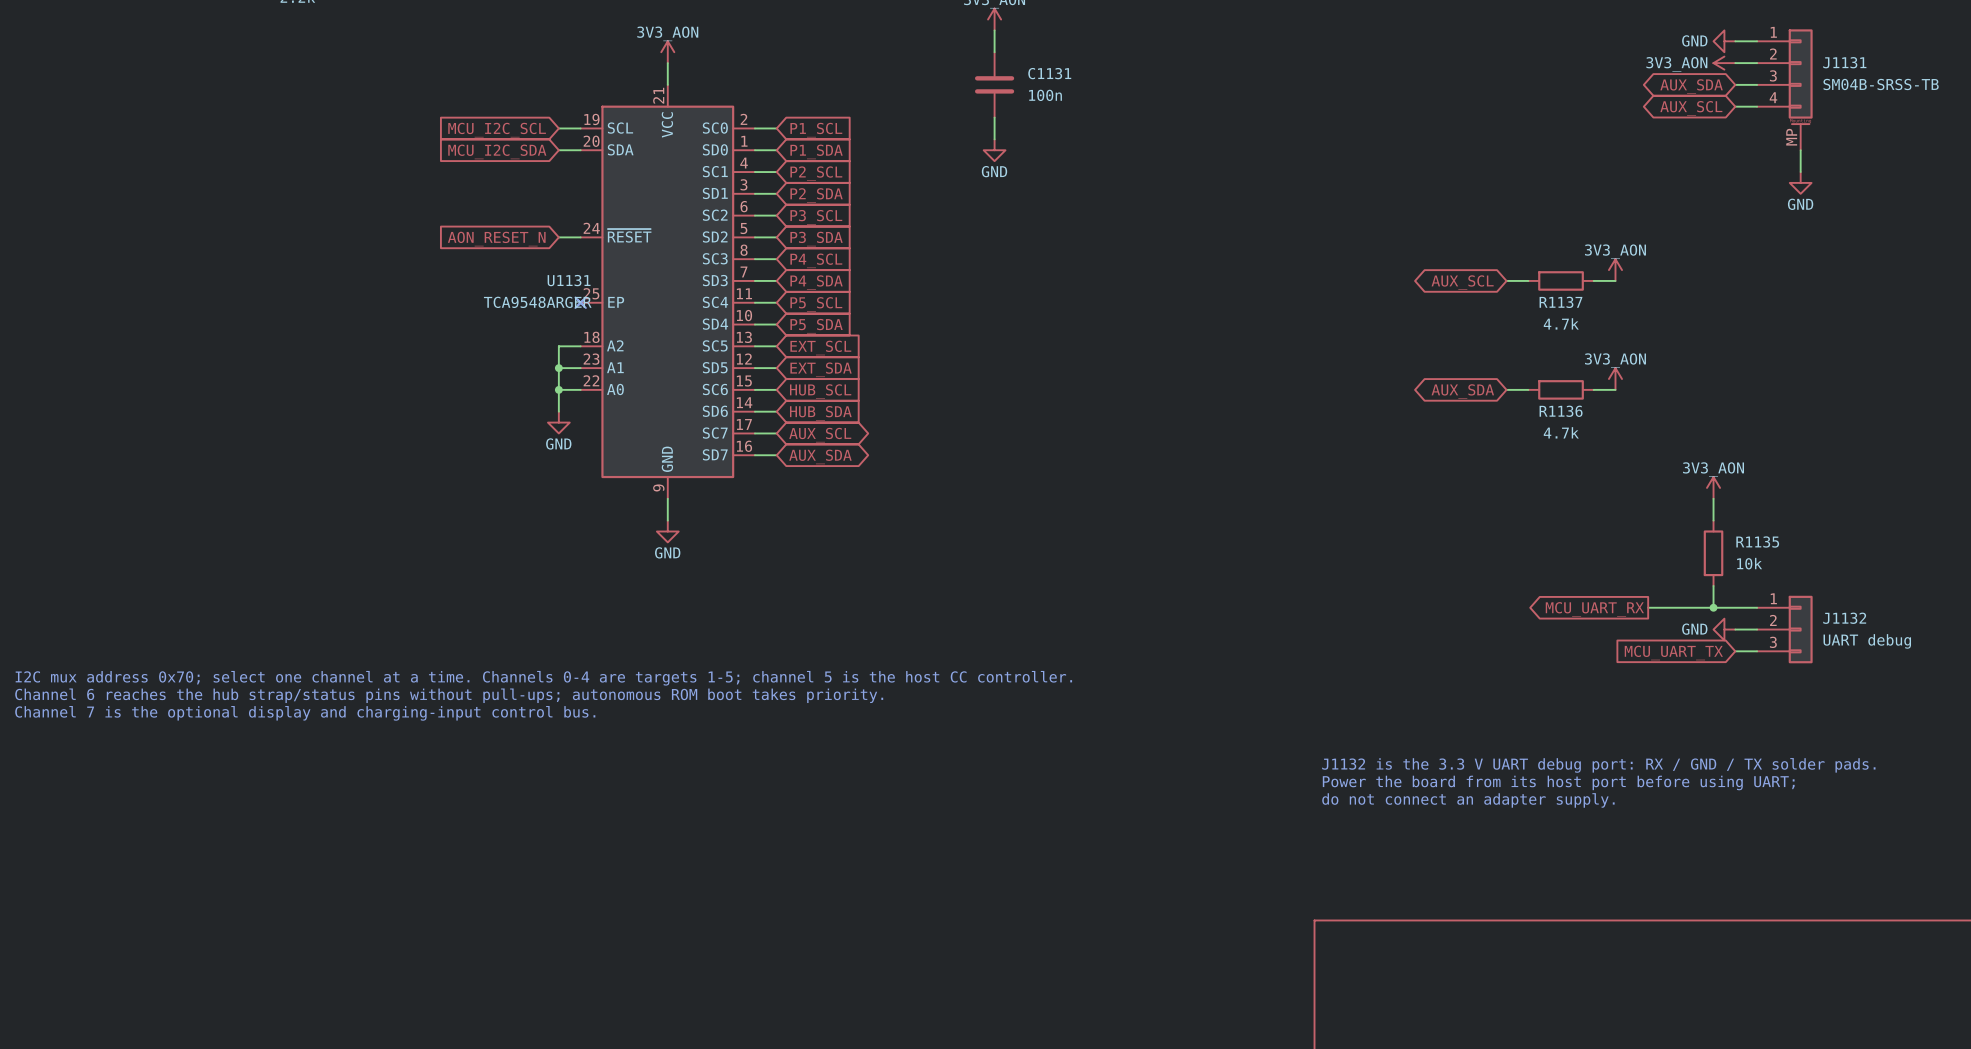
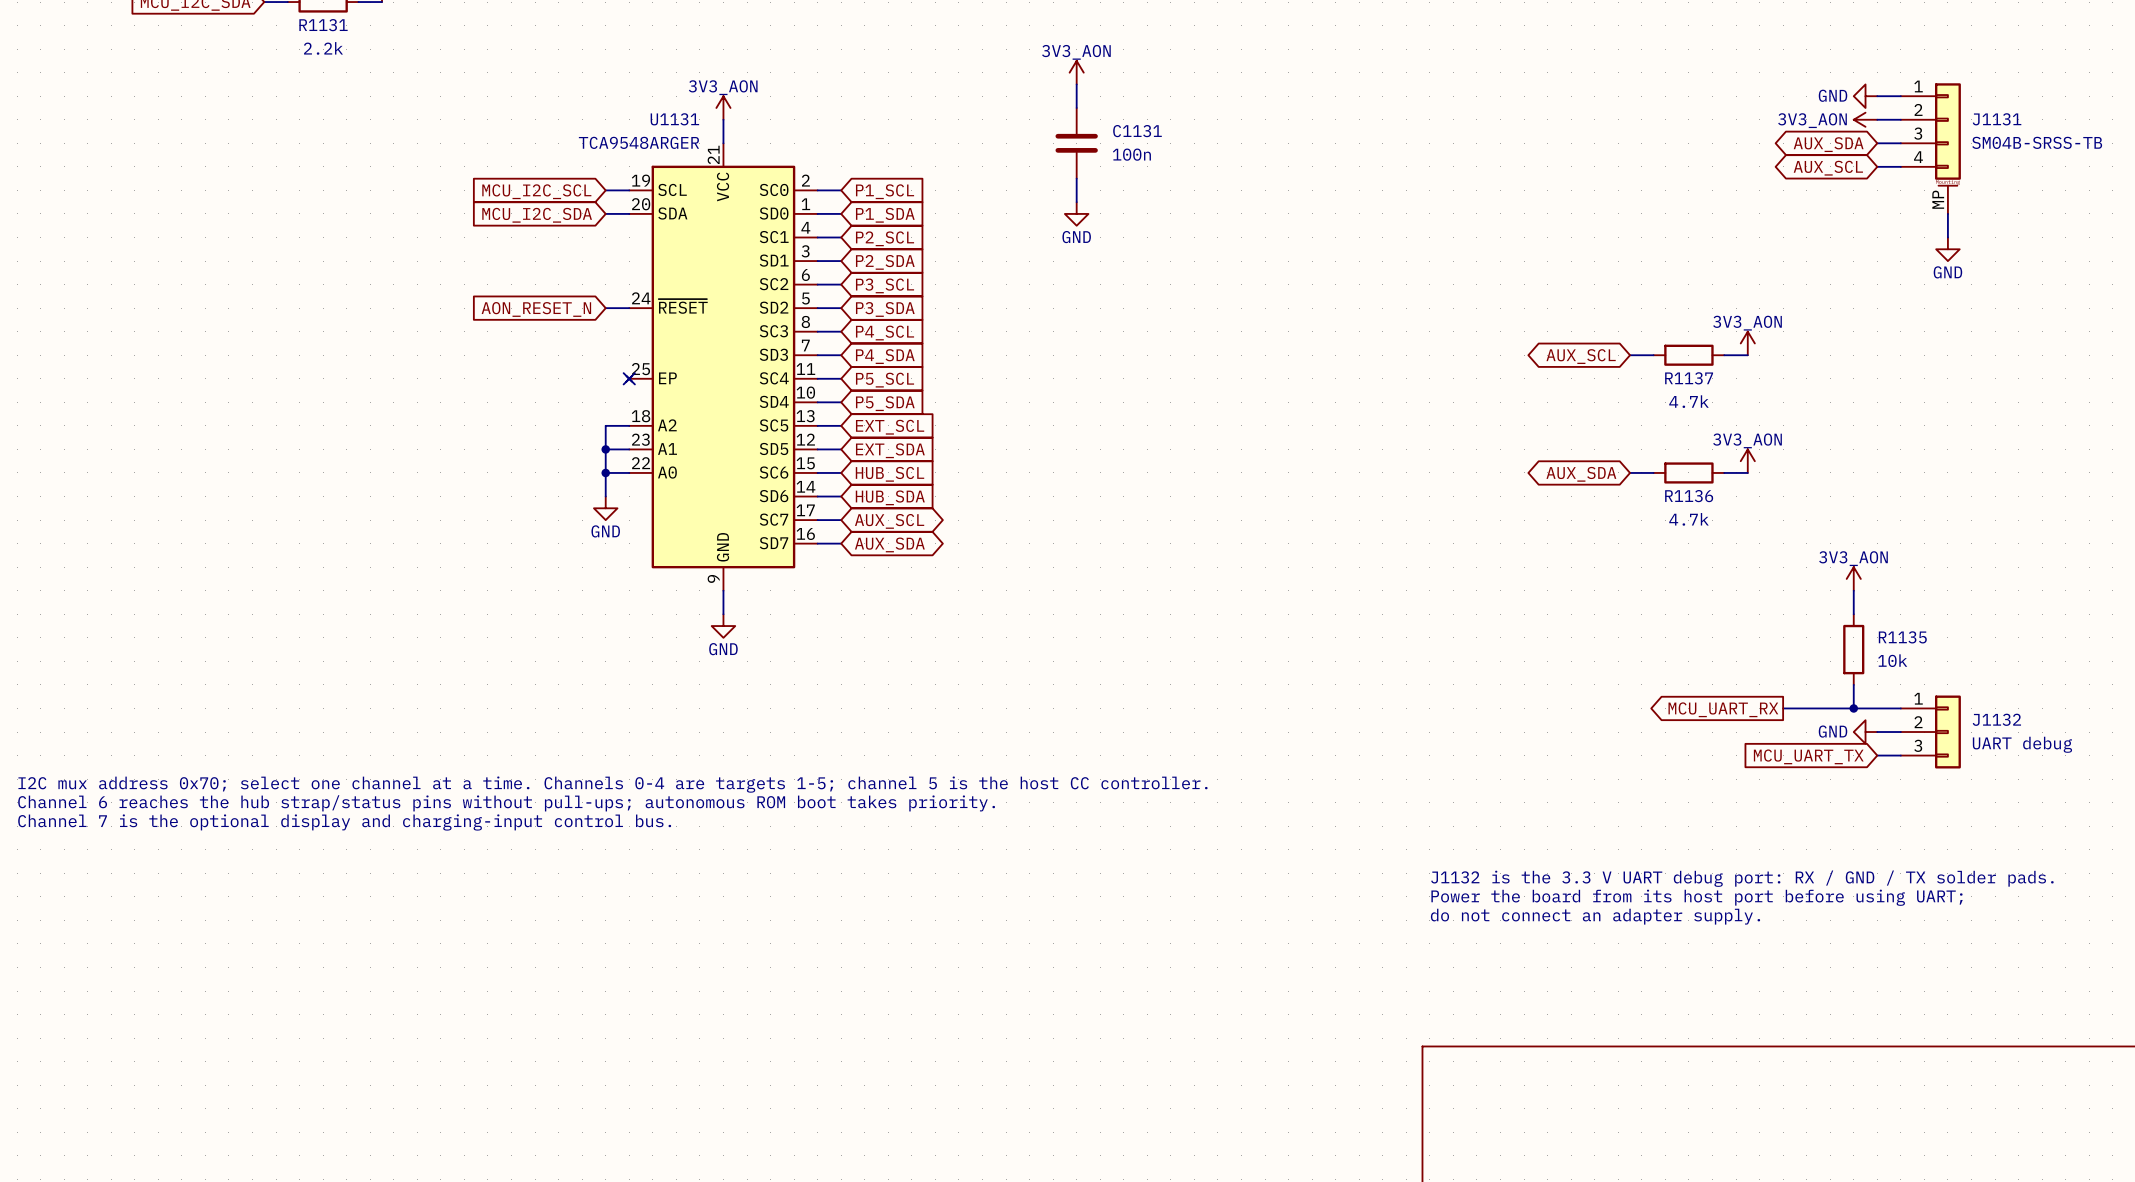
U1131 name position: U1131 (569, 280) -> U1131 (674, 119)
U1131 value position: TCA9548ARGER (537, 302) -> TCA9548ARGER (638, 142)

